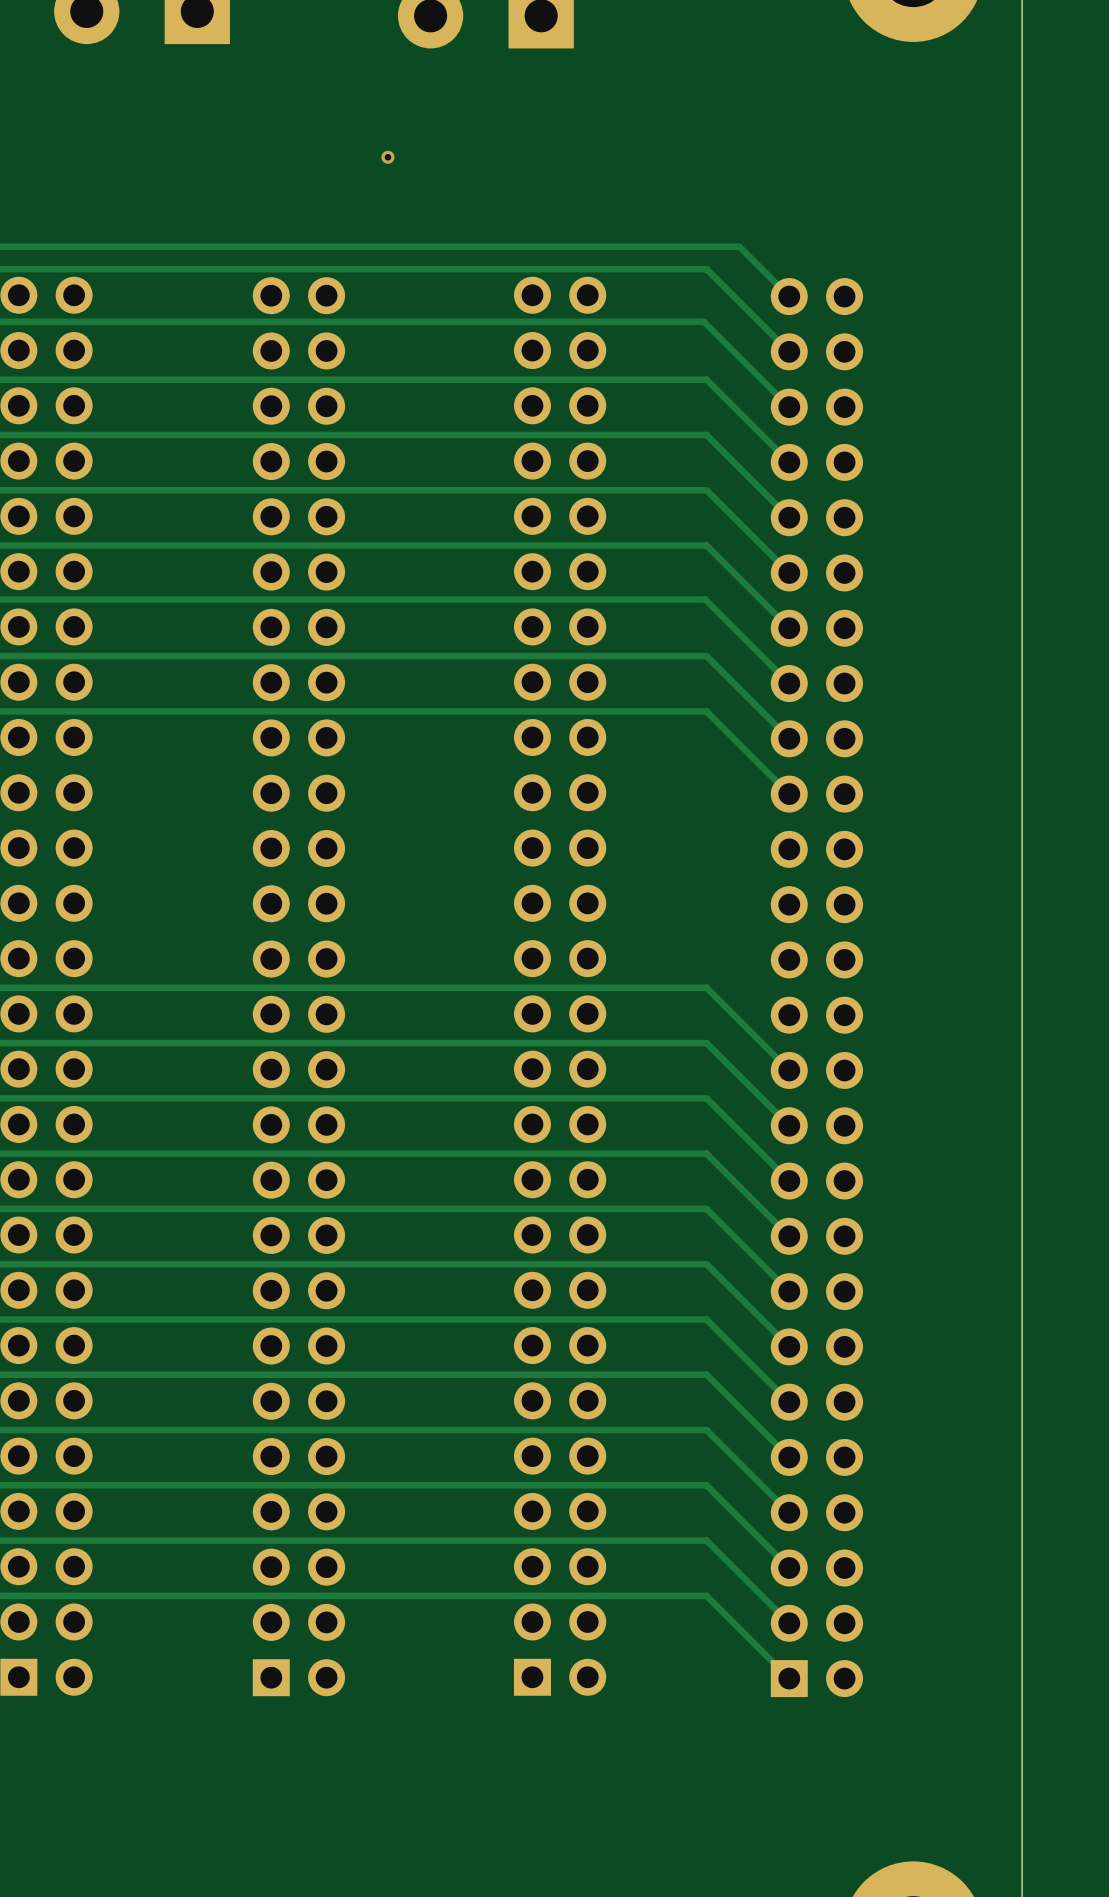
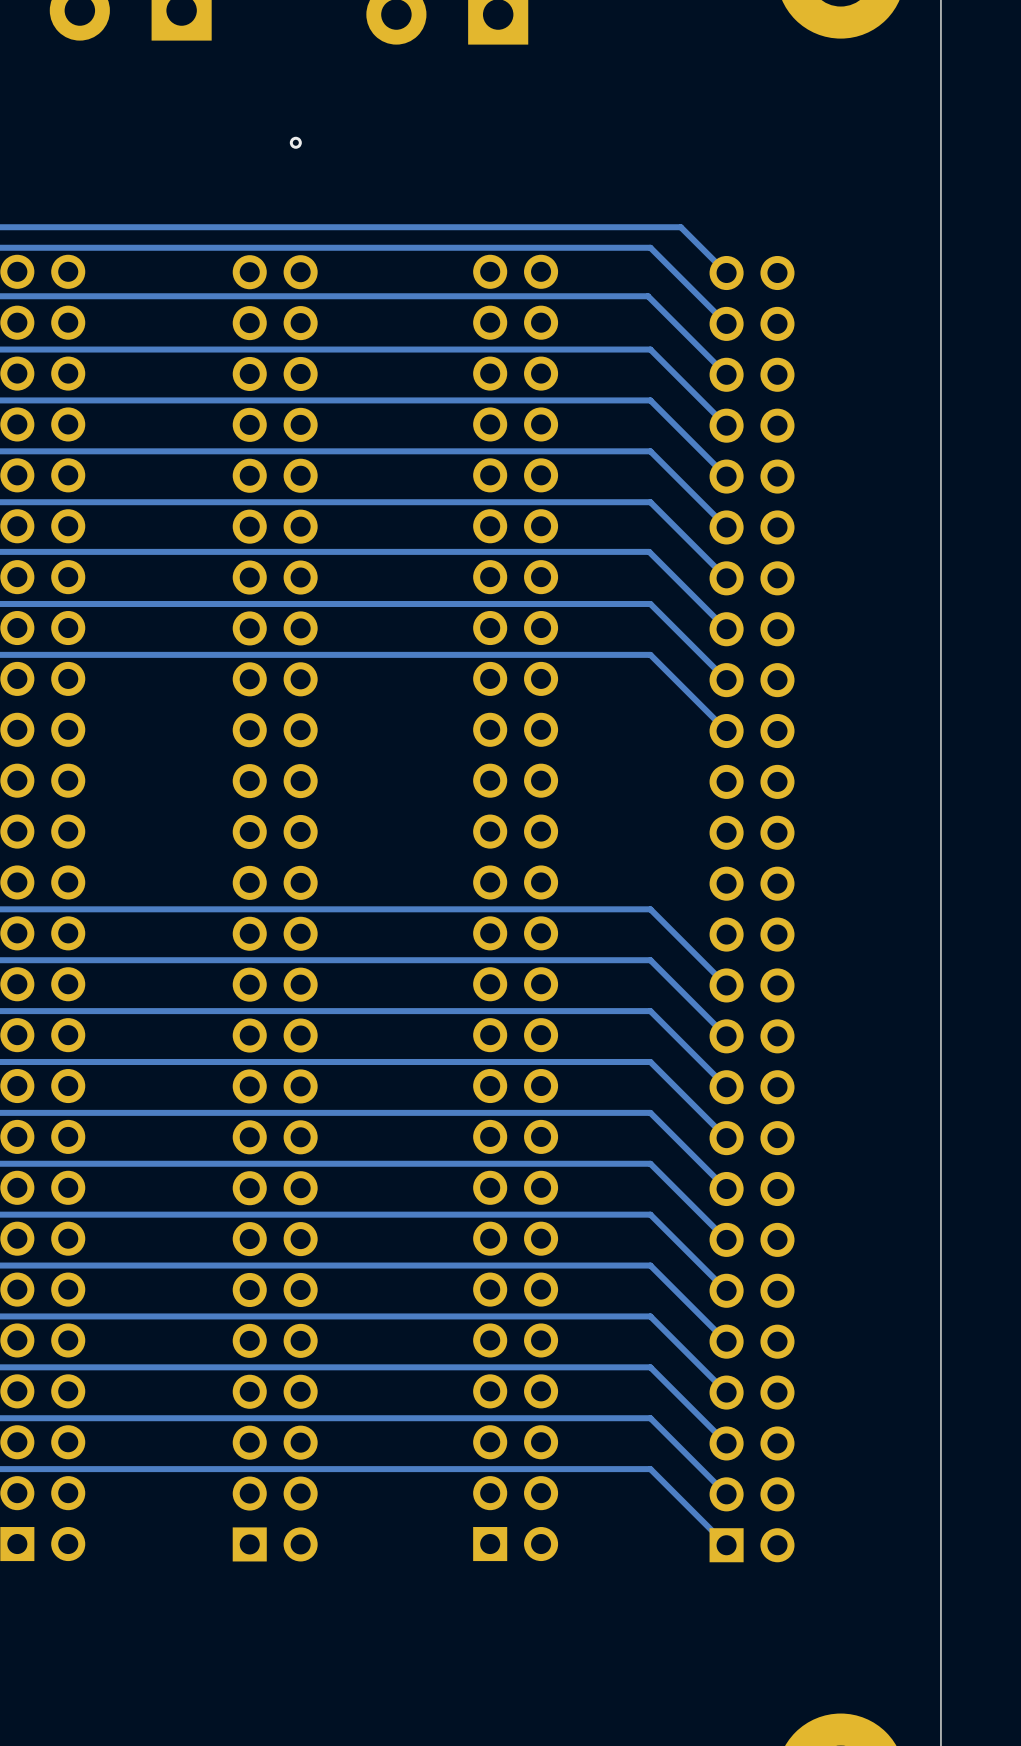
via position: (387, 157) -> (295, 142)

